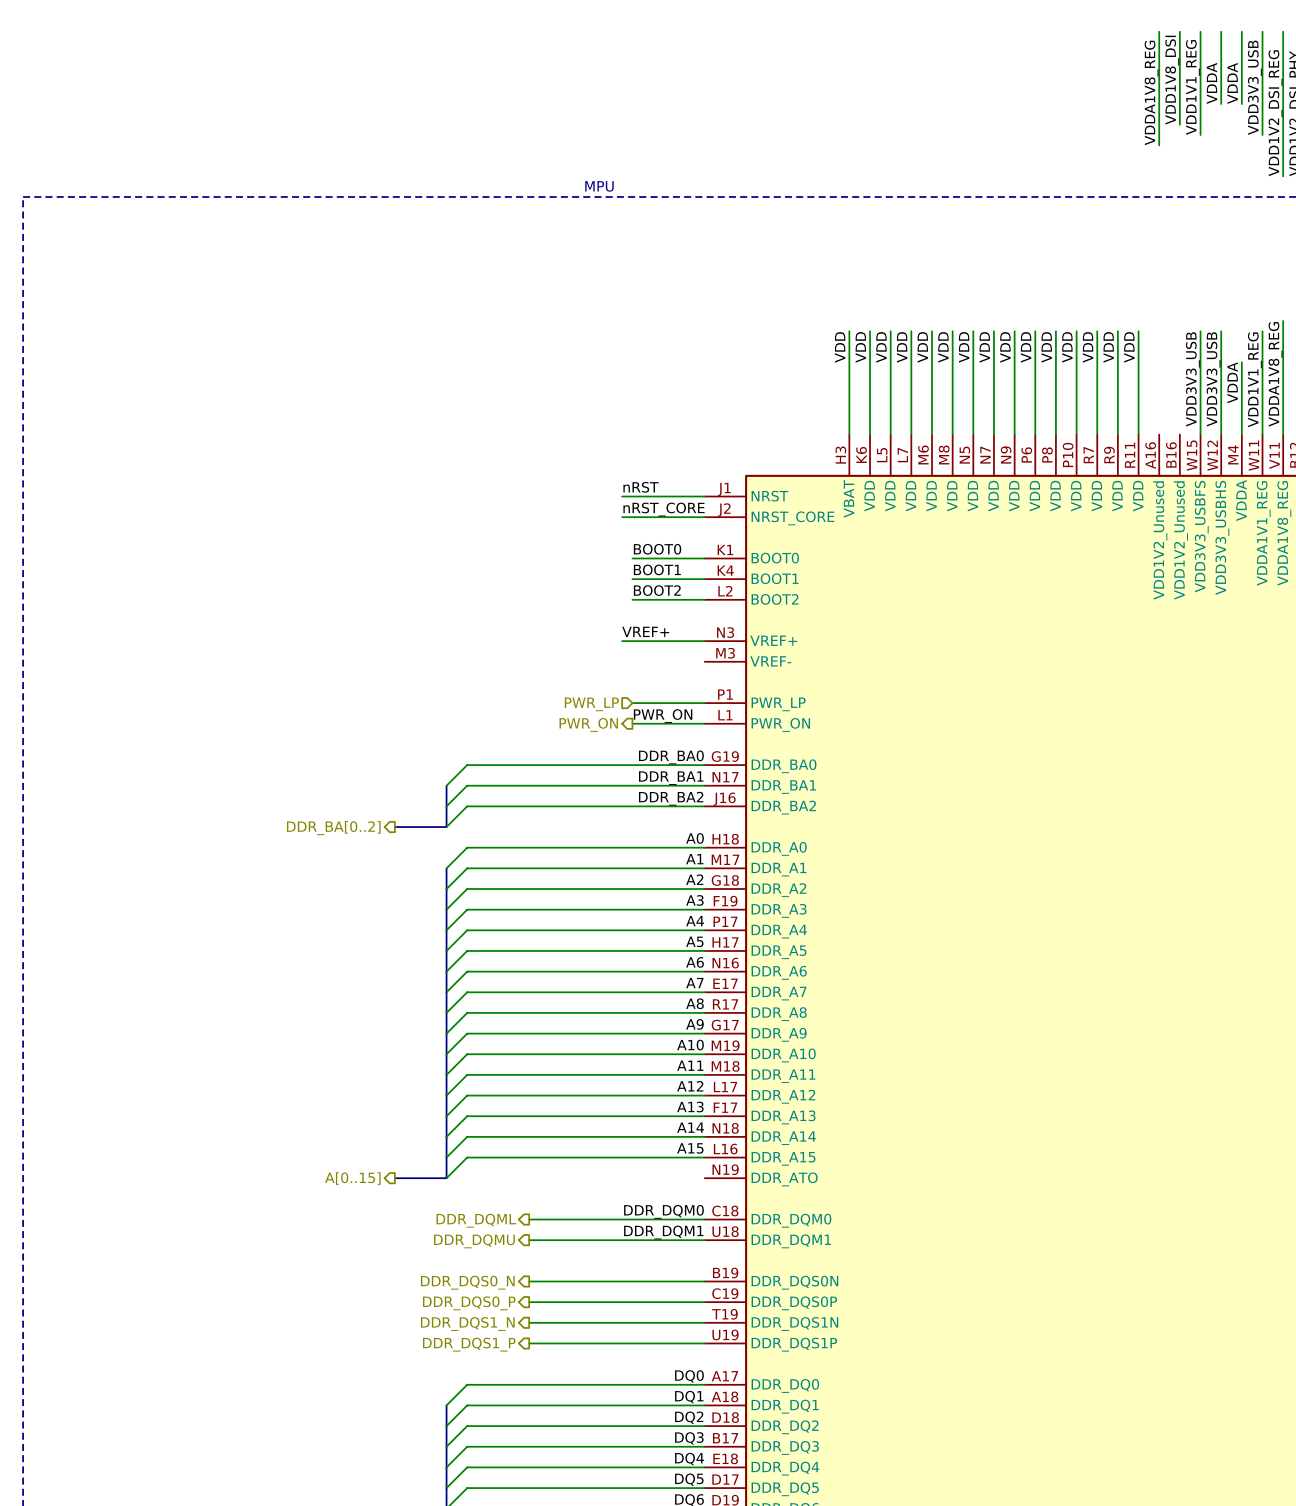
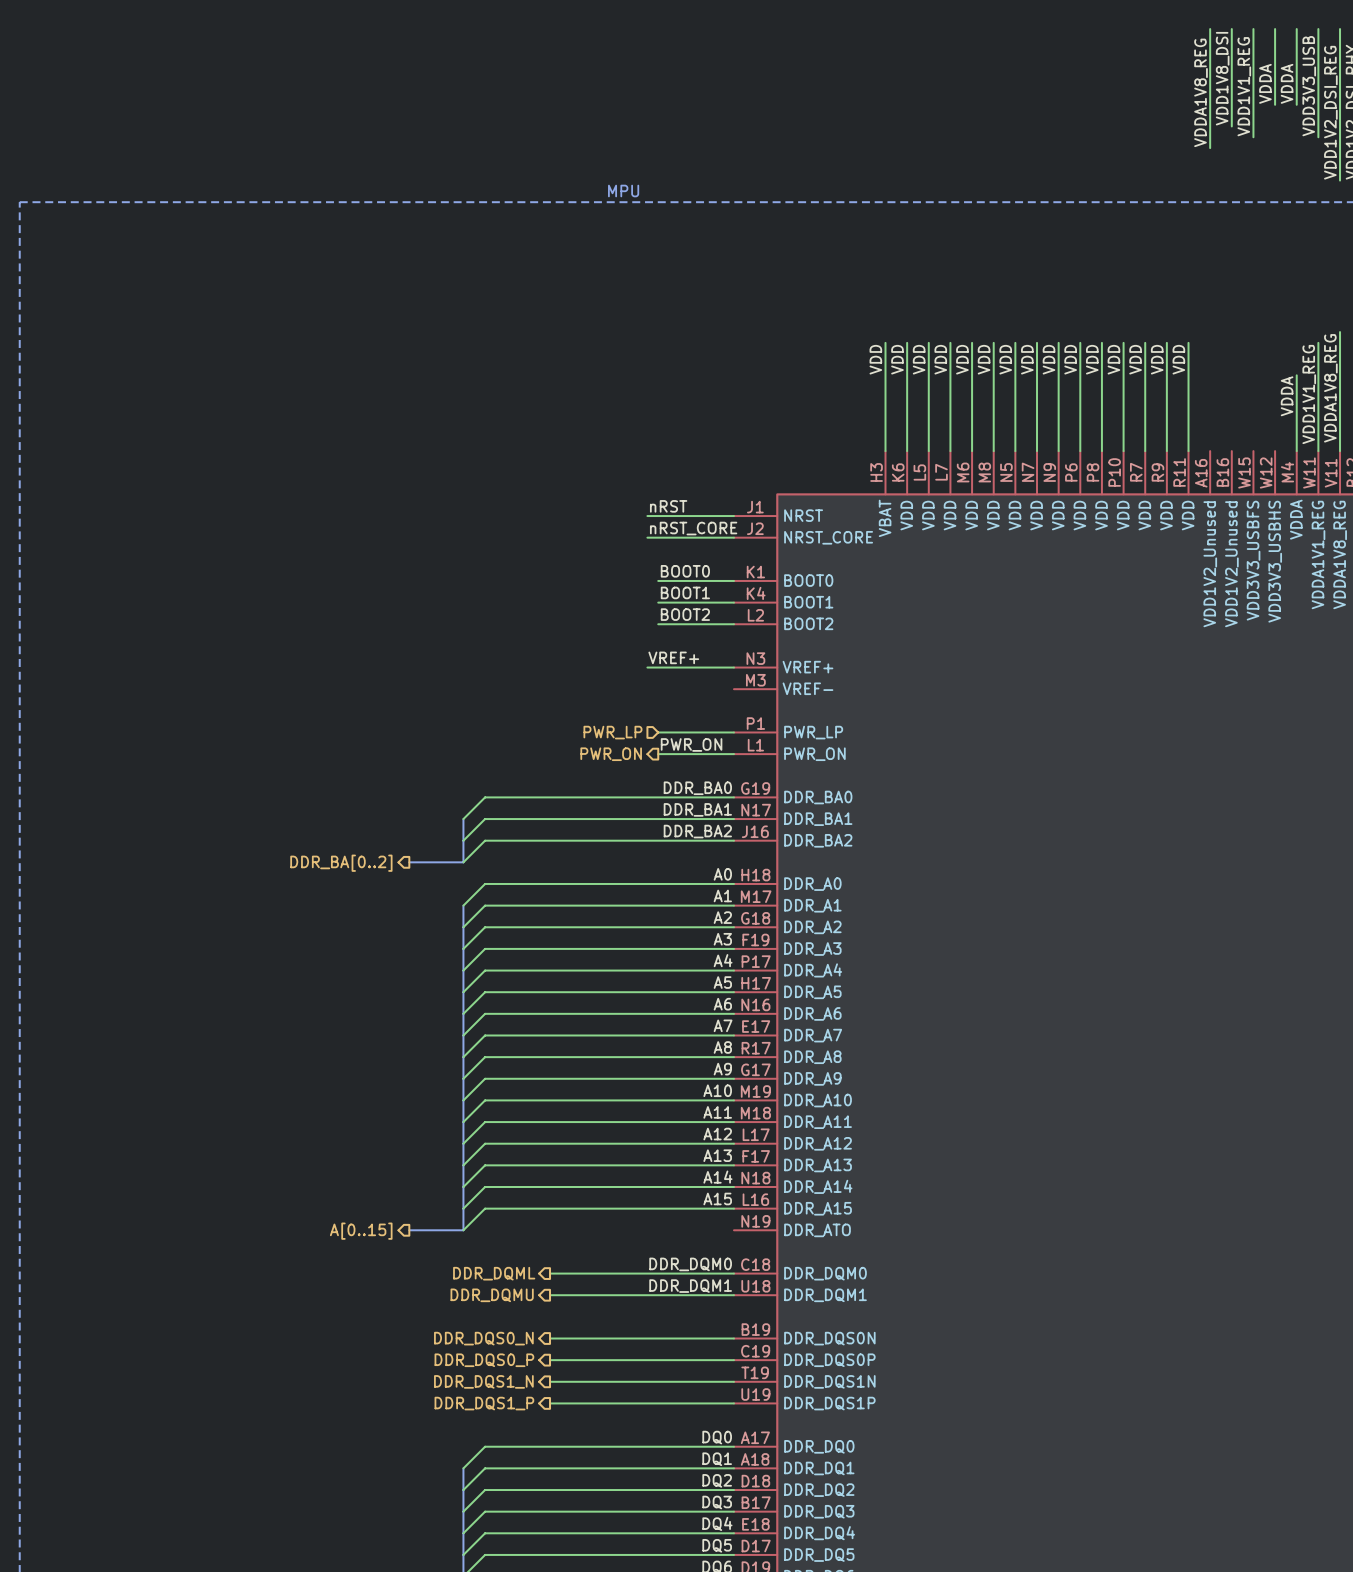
wire: (1200, 331) (1200, 434) -> none
wire: (1221, 331) (1221, 434) -> none
label: VDD3V3_USB (1192, 379) -> none
label: VDD3V3_USB (1213, 379) -> none

